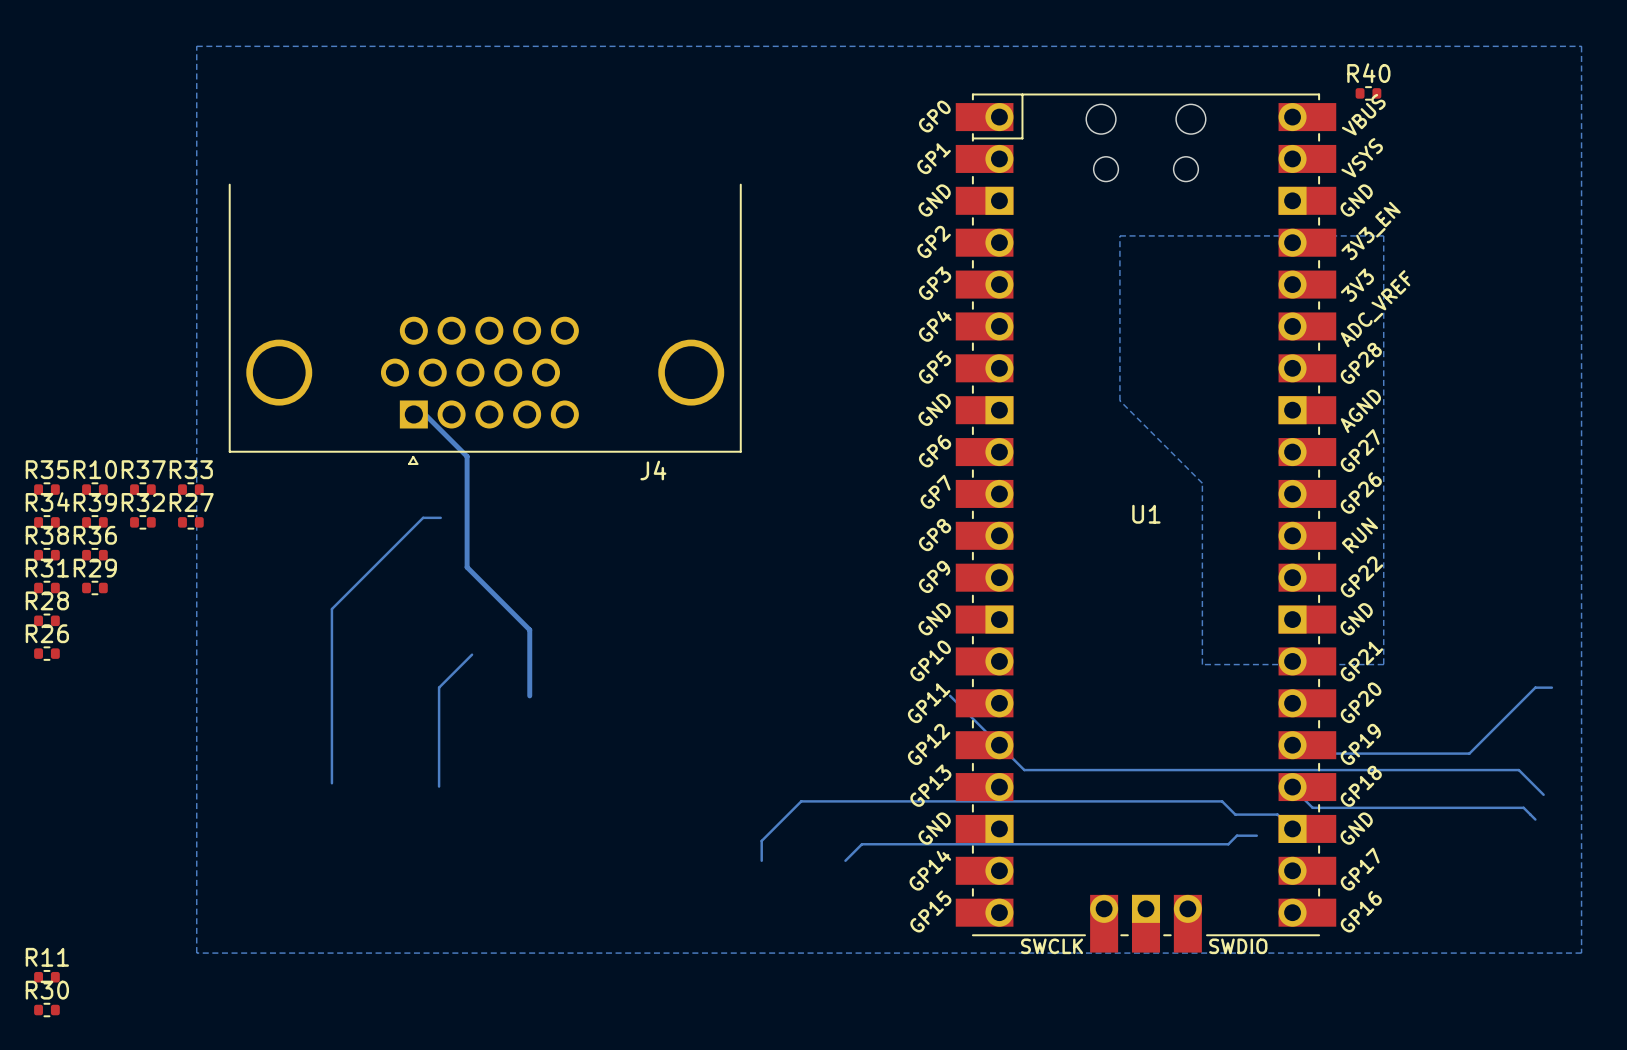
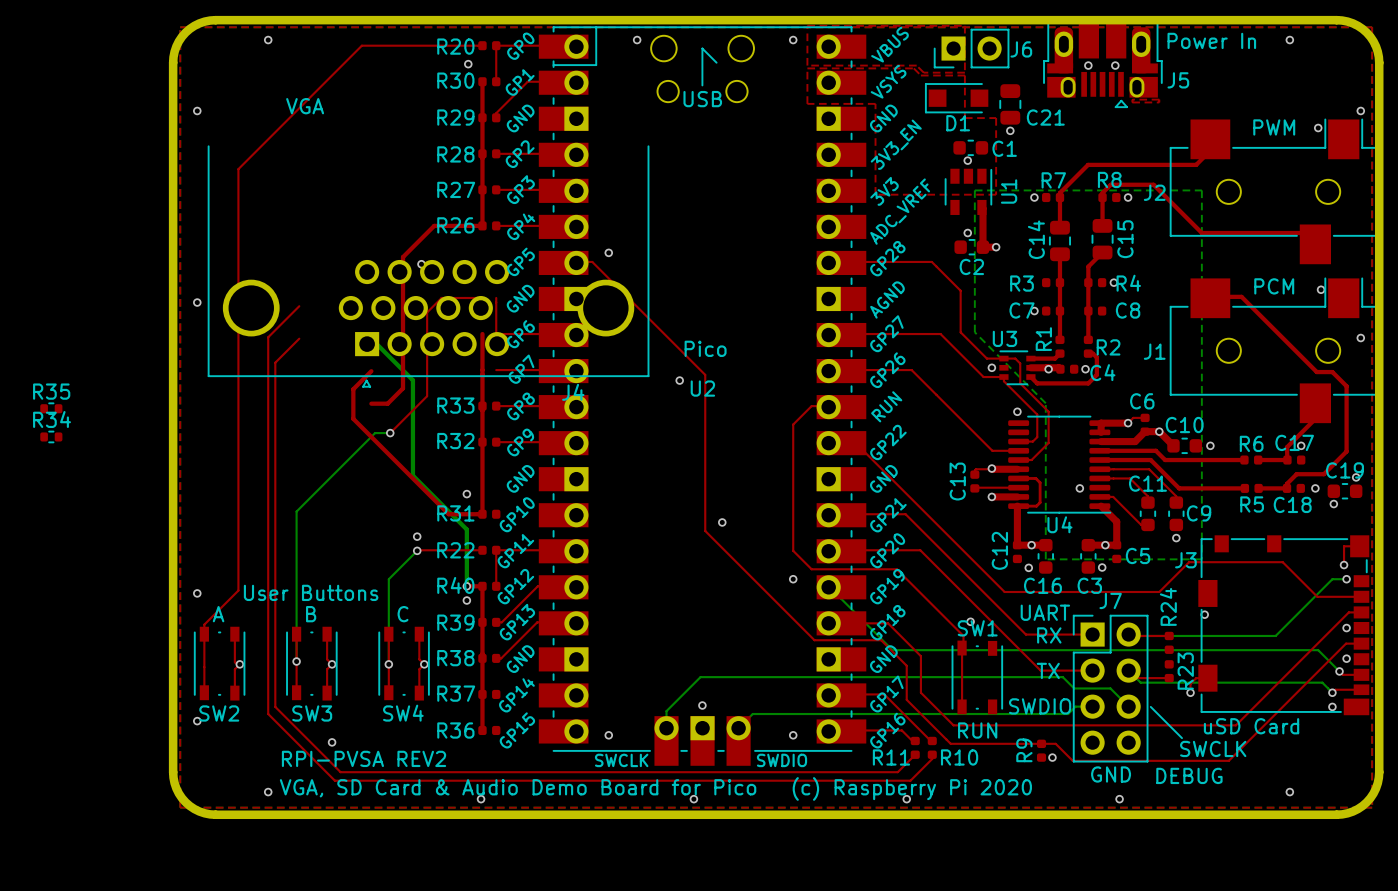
board edge: none -> (215, 20) (1336, 20) (1347, 21) (1362, 28) (1375, 46) (1379, 62) (1379, 772) (1375, 788) (1370, 798) (1352, 811) (1336, 814) (215, 814) (199, 811) (189, 805) (176, 788) (173, 772) (173, 62) (176, 46) (185, 32) (199, 23) (215, 20)
top zone outline: none -> (807, 25) (807, 65) (916, 65) (923, 72) (964, 72) (964, 25) (807, 25)
top zone outline: none -> (180, 27) (180, 807) (1372, 807) (1372, 27) (180, 27)
via: none -> (268, 40)
via: none -> (637, 40)
via: none -> (793, 40)
via: none -> (1289, 40)
text: none -> Power In (1211, 40)
top track: none -> (482, 45) (361, 45) (238, 169) (238, 590) (204, 624) (204, 692)
R20: none -> (489, 45)
top track: none -> (576, 45) (496, 45) (496, 81)
J6: none -> (971, 48)
R40 name position: R40 (1368, 73) -> R40 (455, 585)
R40 footprint: [1355, 86, 1382, 101] -> [478, 581, 501, 591]
line: none -> (716, 62) (702, 48) (702, 85)
via: none -> (468, 64)
J5: none -> (1102, 64)
via: none -> (1088, 65)
via: none -> (1115, 65)
U1 footprint: [955, 93, 1337, 953] -> [944, 168, 993, 215]
top zone outline: none -> (807, 68) (807, 103) (875, 103) (875, 194) (996, 194) (996, 118) (964, 118) (964, 75) (920, 75) (913, 68) (807, 68)
top track: none -> (482, 81) (482, 225) (434, 225) (403, 257) (403, 388) (387, 403) (371, 403)
top track: none -> (576, 81) (527, 81) (496, 113) (496, 117)
D1: none -> (956, 98)
text: none -> USB (702, 99)
top zone outline: none -> (1132, 99) (1132, 102) (1159, 102) (1159, 99) (1132, 99)
C21: none -> (1010, 104)
text: none -> VGA (305, 106)
via: none -> (197, 110)
via: none -> (1360, 110)
text: none -> PWM (1274, 127)
top track: none -> (1210, 128) (1210, 150) (1196, 164) (1088, 164) (1059, 192) (1059, 227)
via: none -> (1318, 128)
via: none -> (1010, 130)
C1: none -> (970, 147)
top track: none -> (496, 153) (576, 153)
via: none -> (967, 160)
top track: none -> (496, 189) (576, 189)
J2: none -> (1274, 191)
via: none -> (1034, 197)
R7: none -> (1053, 197)
R8: none -> (1109, 197)
via: none -> (1128, 197)
top track: none -> (981, 207) (983, 247) (996, 247)
top track: none -> (496, 225) (576, 225)
top track: none -> (1102, 225) (1102, 192) (1110, 184) (1153, 184) (1201, 233) (1315, 233)
via: none -> (967, 233)
C15: none -> (1102, 239)
C14: none -> (1059, 240)
C2: none -> (971, 247)
via: none -> (996, 247)
via: none -> (608, 252)
top track: none -> (1102, 252) (1088, 266) (1088, 339)
top track: none -> (576, 261) (592, 261) (705, 374) (705, 530) (814, 640) (881, 640) (906, 665) (906, 699) (950, 743) (1055, 743) (1072, 760) (1228, 760) (1346, 643) (1361, 643)
top track: none -> (828, 261) (931, 261) (960, 290) (960, 332) (986, 358) (1015, 358) (1020, 363) (1020, 383) (1048, 411) (1048, 443) (1031, 460) (1017, 460)
via: none -> (421, 264)
R3: none -> (1053, 282)
R4: none -> (1095, 282)
via: none -> (1113, 282)
text: none -> PCM (1274, 286)
top track: none -> (1210, 289) (1217, 296) (1241, 296) (1316, 372) (1332, 372) (1346, 386) (1346, 451) (1323, 474) (1296, 474) (1287, 483) (1287, 488) (1258, 488)
via: none -> (1321, 289)
top track: none -> (482, 297) (441, 297) (427, 312) (427, 396) (390, 433)
top track: none -> (496, 297) (496, 334) (576, 334)
via: none -> (197, 302)
top track: none -> (299, 306) (268, 337) (268, 714) (334, 780) (910, 780) (932, 758) (932, 754)
via: none -> (1034, 311)
C7: none -> (1053, 311)
top track: none -> (1059, 311) (1059, 254) (1059, 339)
C8: none -> (1095, 311)
top track: none -> (482, 334) (482, 514) (448, 514) (353, 418) (353, 389) (371, 371)
top track: none -> (828, 334) (940, 334) (983, 377) (1003, 377) (1003, 381) (1037, 414) (1037, 437) (1032, 441) (1017, 441)
via: none -> (1360, 338)
top track: none -> (299, 338) (275, 362) (275, 706) (340, 772) (897, 772) (915, 754)
R1: none -> (1059, 346)
R2: none -> (1088, 346)
text: none -> Pico (705, 348)
J1: none -> (1274, 350)
top track: none -> (1059, 353) (1055, 358) (1030, 358)
top track: none -> (1088, 353) (1092, 353) (1096, 357) (1096, 374) (1088, 383) (1037, 383) (1030, 377)
via: none -> (991, 367)
U3: none -> (1017, 367)
top track: none -> (1030, 367) (1060, 369)
via: none -> (1048, 369)
C4: none -> (1067, 369)
via: none -> (1085, 369)
top track: none -> (496, 370) (576, 370)
top track: none -> (828, 370) (911, 370) (992, 450) (1017, 450)
via: none -> (679, 380)
R10 name position: R10 (95, 469) -> R10 (959, 757)
R37 name position: R37 (143, 469) -> R37 (456, 693)
R33 name position: R33 (191, 469) -> R33 (455, 405)
top track: none -> (1315, 394) (1315, 418) (1287, 447) (1287, 460) (1258, 460)
U2: none -> (702, 396)
R10 footprint: [82, 482, 108, 497] -> [927, 736, 937, 759]
R37 footprint: [130, 482, 156, 497] -> [478, 689, 501, 699]
R33 footprint: [178, 482, 204, 497] -> [478, 401, 501, 411]
top track: none -> (496, 406) (576, 406)
top track: none -> (828, 406) (811, 406) (793, 424) (793, 550) (811, 569) (896, 569) (963, 635) (962, 706)
via: none -> (1017, 411)
top track: none -> (1145, 417) (1133, 417) (1128, 423) (1101, 423) (1101, 432)
R39 name position: R39 (95, 502) -> R39 (455, 622)
R32 name position: R32 (143, 502) -> R32 (455, 441)
R27 name position: R27 (191, 502) -> R27 (456, 189)
via: none -> (1128, 423)
C6: none -> (1145, 424)
U1 name position: U1 (1146, 514) -> U1 (1009, 191)
R39 footprint: [82, 515, 108, 530] -> [478, 617, 501, 627]
R32 footprint: [130, 515, 156, 530] -> [478, 437, 501, 447]
R27 footprint: [178, 515, 204, 530] -> [478, 185, 501, 195]
via: none -> (1159, 431)
via: none -> (390, 433)
top track: none -> (1101, 441) (1135, 441) (1145, 431) (1159, 431) (1173, 445)
top track: none -> (496, 442) (576, 442)
top track: none -> (828, 442) (854, 442) (1004, 591) (1159, 591) (1189, 562) (1282, 562) (1317, 596) (1361, 596)
C10: none -> (1184, 445)
via: none -> (1210, 445)
via: none -> (1301, 445)
R38 name position: R38 (47, 535) -> R38 (455, 658)
R36 name position: R36 (95, 535) -> R36 (455, 730)
top track: none -> (1101, 450) (1155, 450) (1165, 460) (1244, 460)
R38 footprint: [34, 547, 60, 563] -> [478, 653, 501, 663]
R36 footprint: [82, 547, 108, 563] -> [478, 725, 501, 736]
top track: none -> (1101, 460) (1150, 460) (1179, 488) (1244, 488)
R6: none -> (1251, 460)
C17: none -> (1294, 460)
U4: none -> (1059, 464)
top track: none -> (991, 469) (991, 468) (1017, 469) (976, 469) (974, 474)
via: none -> (991, 468)
top track: none -> (1101, 469) (1149, 469) (1176, 496) (1176, 502)
R31 name position: R31 (47, 568) -> R31 (455, 513)
R29 name position: R29 (95, 568) -> R29 (455, 117)
via: none -> (1356, 477)
top track: none -> (1017, 478) (1035, 478) (1040, 482) (1040, 502) (1036, 506) (1017, 506) (1017, 545) (1045, 545)
top track: none -> (1101, 478) (1130, 478) (1147, 496) (1147, 502)
C13: none -> (974, 481)
R31 footprint: [34, 580, 60, 596] -> [478, 509, 501, 519]
R29 footprint: [82, 580, 108, 596] -> [478, 113, 501, 123]
top track: none -> (1017, 487) (974, 488)
via: none -> (1079, 488)
R5: none -> (1251, 488)
C18: none -> (1293, 488)
via: none -> (1315, 488)
C19: none -> (1345, 491)
via: none -> (466, 494)
top track: none -> (991, 496) (1017, 496)
via: none -> (991, 496)
top track: none -> (1101, 496) (1113, 496) (1141, 524) (1147, 524)
R28 name position: R28 (47, 600) -> R28 (455, 154)
via: none -> (1333, 504)
top track: none -> (1101, 506) (1116, 521) (1116, 545) (1088, 545)
C11: none -> (1147, 513)
C9: none -> (1176, 513)
top track: none -> (828, 514) (905, 514) (1025, 634) (1092, 634)
R28 footprint: [34, 613, 60, 629] -> [478, 149, 501, 159]
via: none -> (722, 522)
R26 name position: R26 (47, 633) -> R26 (455, 225)
via: none -> (417, 536)
via: none -> (1176, 538)
R26 footprint: [34, 646, 60, 661] -> [478, 221, 501, 231]
via: none -> (1031, 545)
via: none -> (1105, 545)
top track: none -> (1359, 546) (1344, 546) (1344, 565)
via: none -> (417, 550)
top track: none -> (482, 550) (417, 550)
R22: none -> (489, 550)
top track: none -> (573, 550) (496, 550) (496, 586)
top track: none -> (828, 550) (920, 550) (1040, 670) (1092, 670)
C12: none -> (1017, 552)
C5: none -> (1116, 552)
C16: none -> (1045, 556)
C3: none -> (1088, 556)
via: none -> (1344, 565)
via: none -> (1028, 567)
via: none -> (1102, 567)
via: none -> (793, 579)
via: none -> (1346, 579)
top track: none -> (466, 586) (482, 586) (482, 730)
via: none -> (466, 586)
top track: none -> (574, 586) (537, 586) (501, 622) (496, 622)
text: none -> User Buttons (311, 592)
via: none -> (197, 593)
via: none -> (466, 600)
text: none -> UART (1045, 612)
top track: none -> (1361, 612) (1348, 612) (1235, 725) (953, 725) (920, 692) (920, 656) (888, 623) (828, 623)
text: none -> A (218, 614)
text: none -> B (311, 614)
text: none -> C (403, 614)
via: none -> (1204, 614)
top track: none -> (573, 622) (537, 622) (501, 658) (496, 658)
via: none -> (970, 621)
J3: none -> (1283, 625)
via: none -> (1346, 628)
top track: none -> (234, 634) (234, 662) (239, 664) (234, 669) (234, 693)
top track: none -> (296, 634) (296, 692)
top track: none -> (327, 634) (327, 659) (332, 664) (327, 669) (327, 693)
top track: none -> (388, 634) (388, 692)
top track: none -> (419, 634) (419, 659) (424, 664) (419, 669) (419, 693)
top track: none -> (1128, 634) (1169, 635)
text: none -> RX (1049, 635)
R23: none -> (1169, 642)
via: none -> (1346, 658)
via: none -> (296, 661)
SW2: none -> (219, 663)
SW3: none -> (311, 663)
SW4: none -> (404, 663)
via: none -> (239, 664)
via: none -> (332, 664)
via: none -> (388, 664)
via: none -> (424, 664)
top track: none -> (1128, 670) (1136, 678) (1169, 678)
text: none -> TX (1048, 670)
R24: none -> (1169, 671)
top track: none -> (1339, 671) (1342, 674) (1361, 674)
via: none -> (1339, 671)
SW1: none -> (977, 677)
top track: none -> (1207, 678) (1196, 678) (1190, 683) (1190, 692)
J7: none -> (1110, 688)
top track: none -> (1361, 689) (1335, 689) (1332, 692)
via: none -> (1190, 692)
via: none -> (1332, 692)
top track: none -> (828, 694) (884, 694) (932, 740)
via: none -> (702, 705)
text: none -> SWDIO (1040, 706)
line: none -> (1150, 706) (1182, 738)
via: none -> (1332, 706)
via: none -> (197, 721)
text: none -> uSD Card (1251, 726)
top track: none -> (828, 730) (901, 730) (912, 740) (915, 740)
text: none -> RUN (977, 730)
via: none -> (608, 735)
via: none -> (793, 735)
via: none -> (332, 742)
text: none -> SWCLK (1213, 748)
R9: none -> (1041, 750)
via: none -> (1052, 757)
text: none -> RPI-PVSA REV2 (364, 758)
text: none -> GND (1111, 774)
text: none -> DEBUG (1189, 775)
text: none -> VGA, SD Card & Audio Demo Board for Pico (c) Raspberry Pi 2020 (655, 788)
via: none -> (268, 792)
via: none -> (1289, 792)
via: none -> (481, 799)
via: none -> (693, 799)
via: none -> (906, 799)
via: none -> (1119, 799)
R11 name position: R11 (47, 957) -> R11 (891, 757)
R11 footprint: [34, 969, 60, 985] -> [910, 736, 920, 759]
R30 name position: R30 (47, 990) -> R30 (455, 80)
R30 footprint: [34, 1002, 60, 1018] -> [478, 77, 501, 87]

